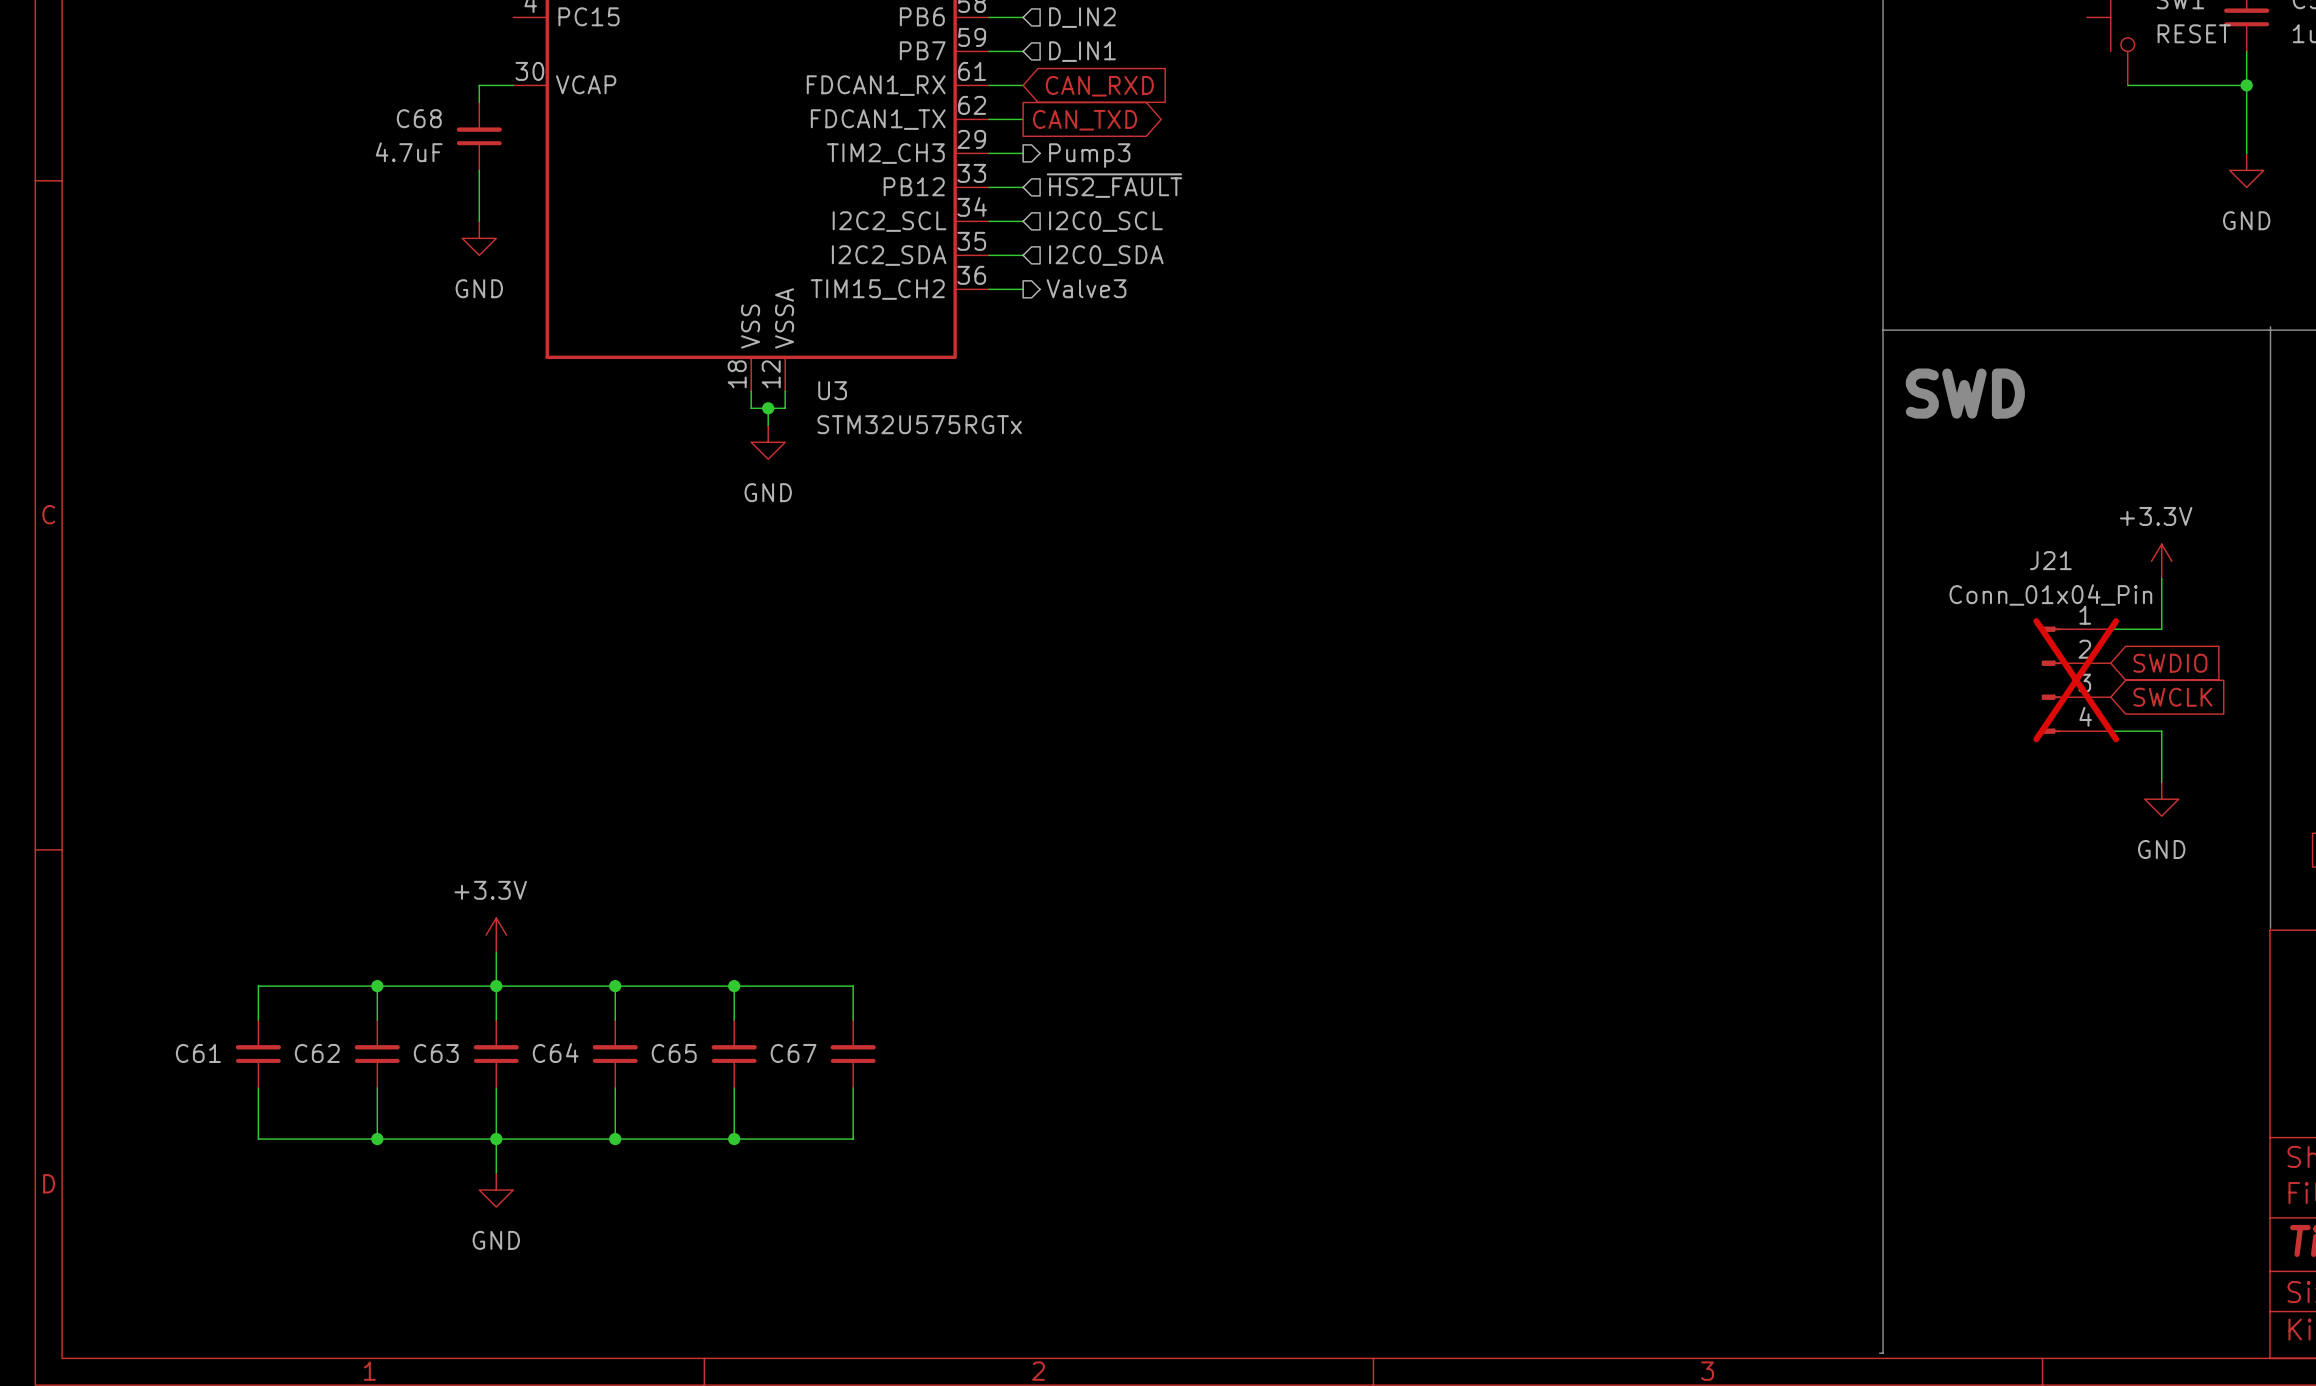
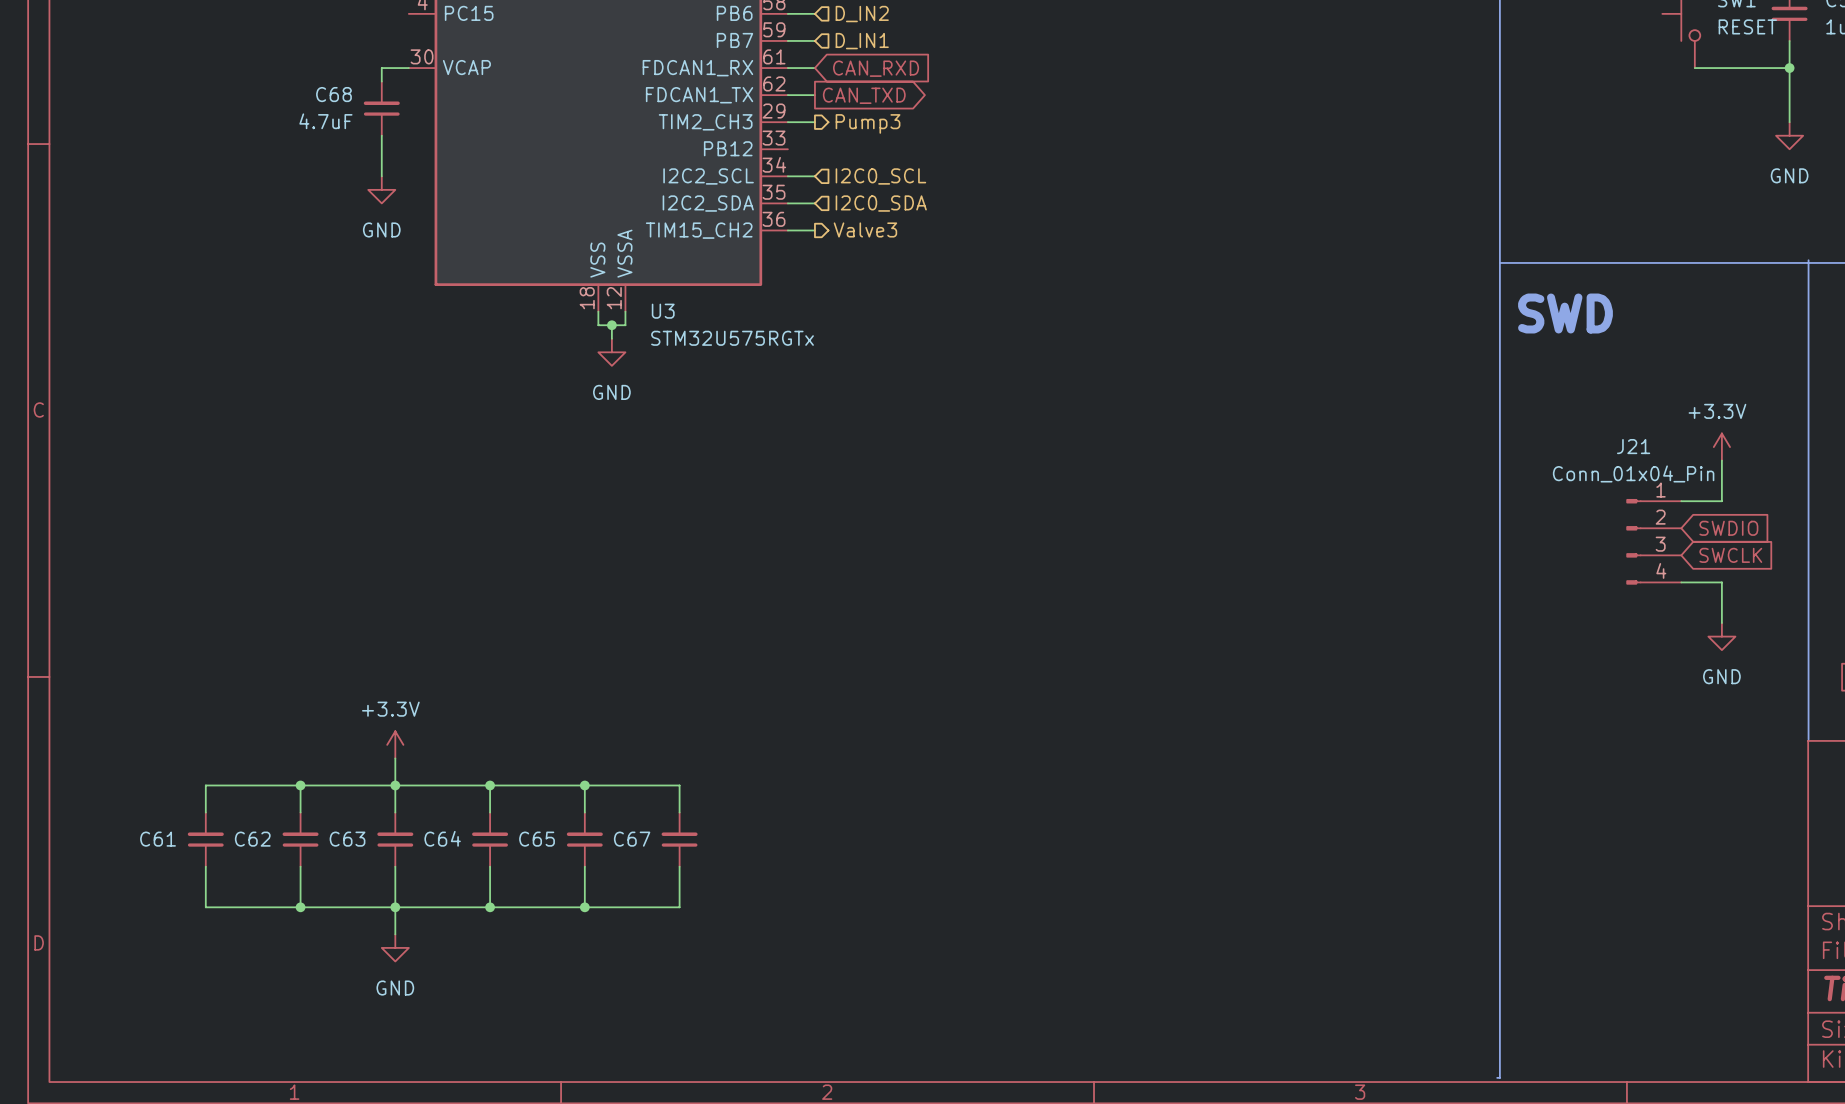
hierarchical label: ~{HS2_FAULT} (1114, 185) -> none
wire: (989, 187) (1023, 187) -> none
J21 do-not-place cross: (2076, 680) -> none

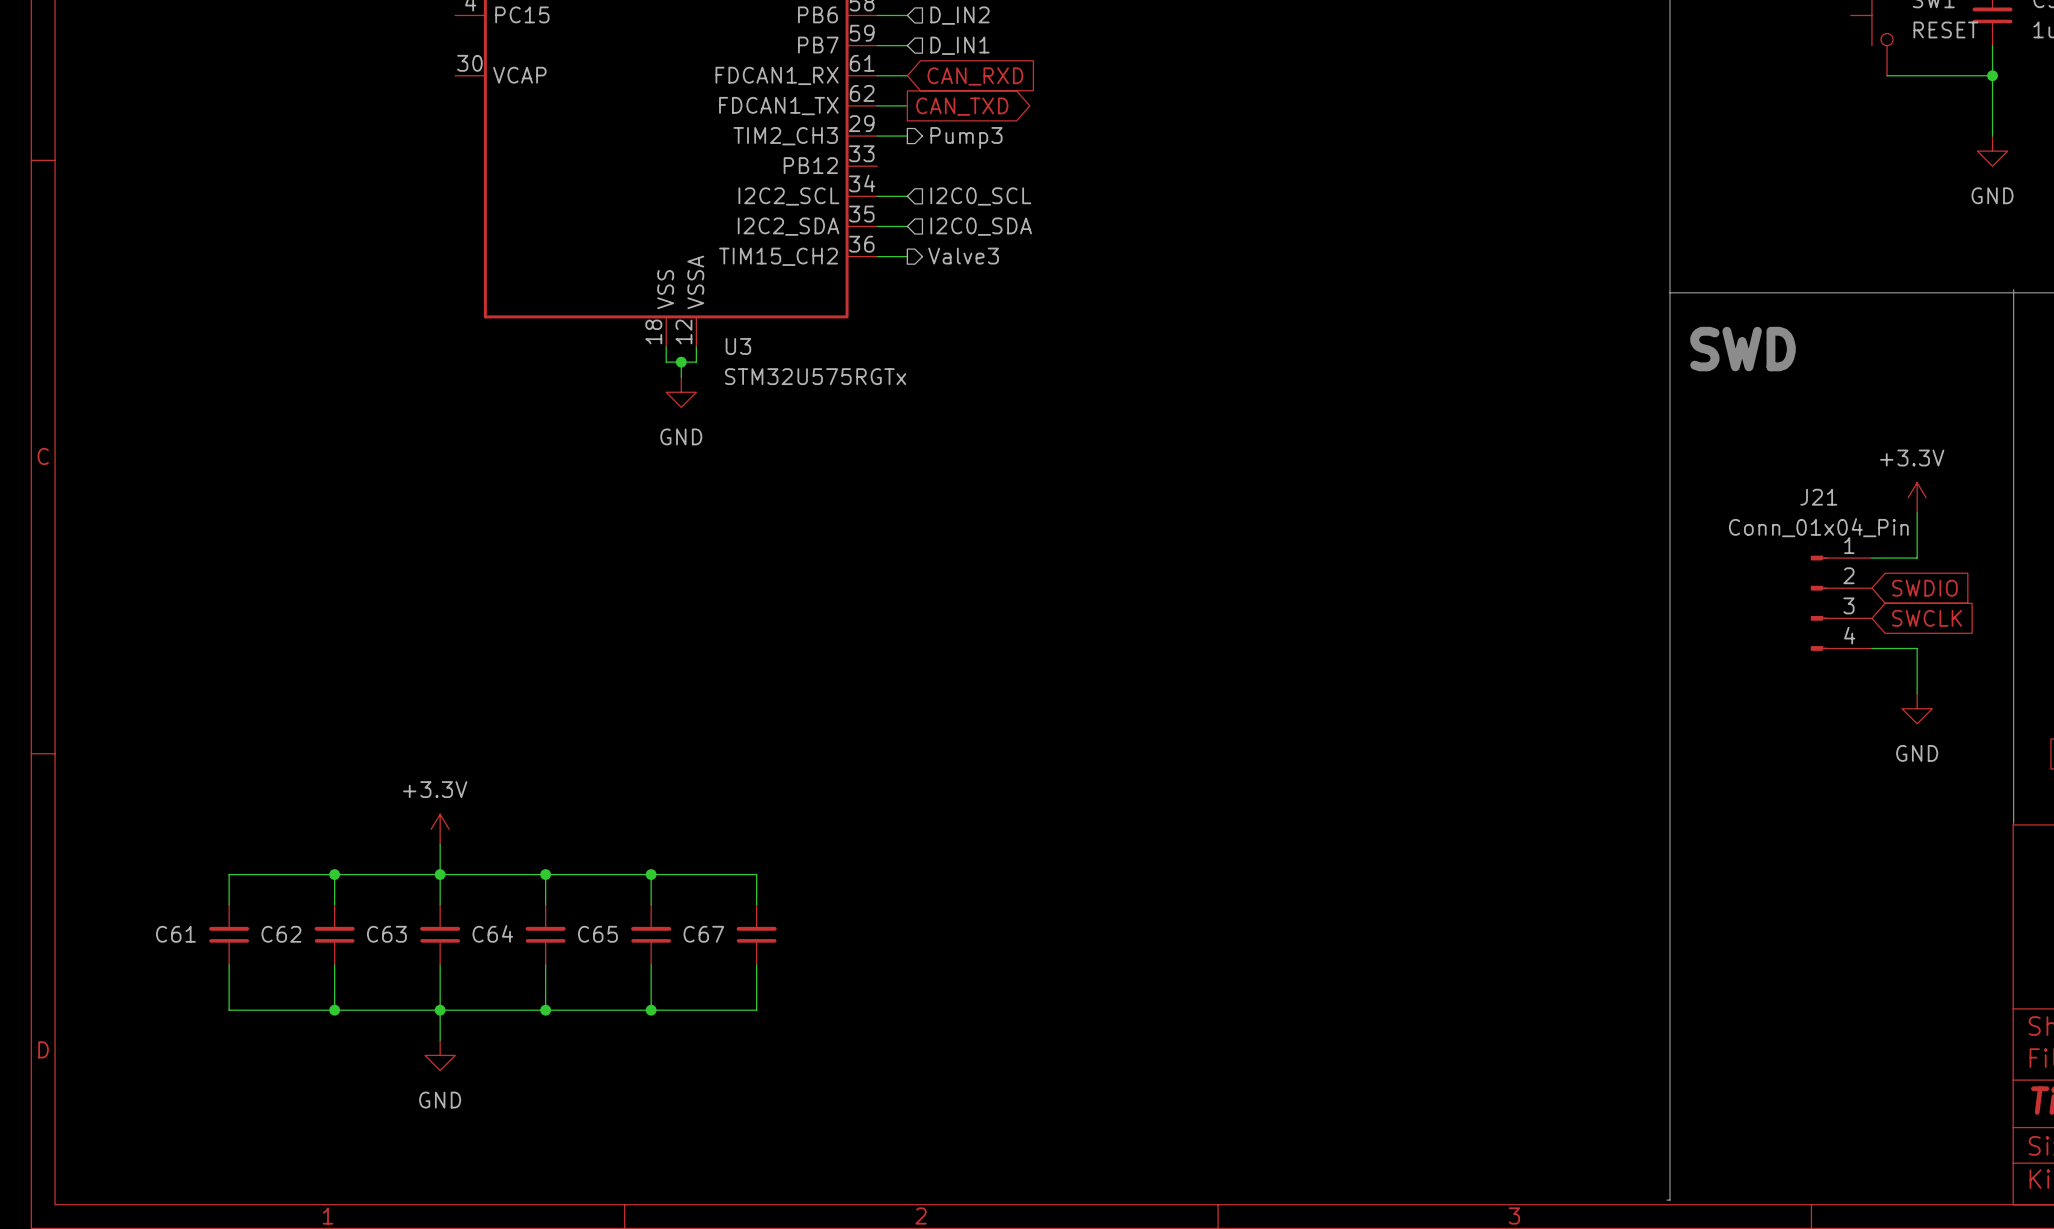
wire: (408, 68) (381, 68) (381, 81) -> none
C68: 4.7uF (381, 108) -> none
wire: (381, 135) (381, 176) -> none
power symbol: GND (381, 189) -> none

